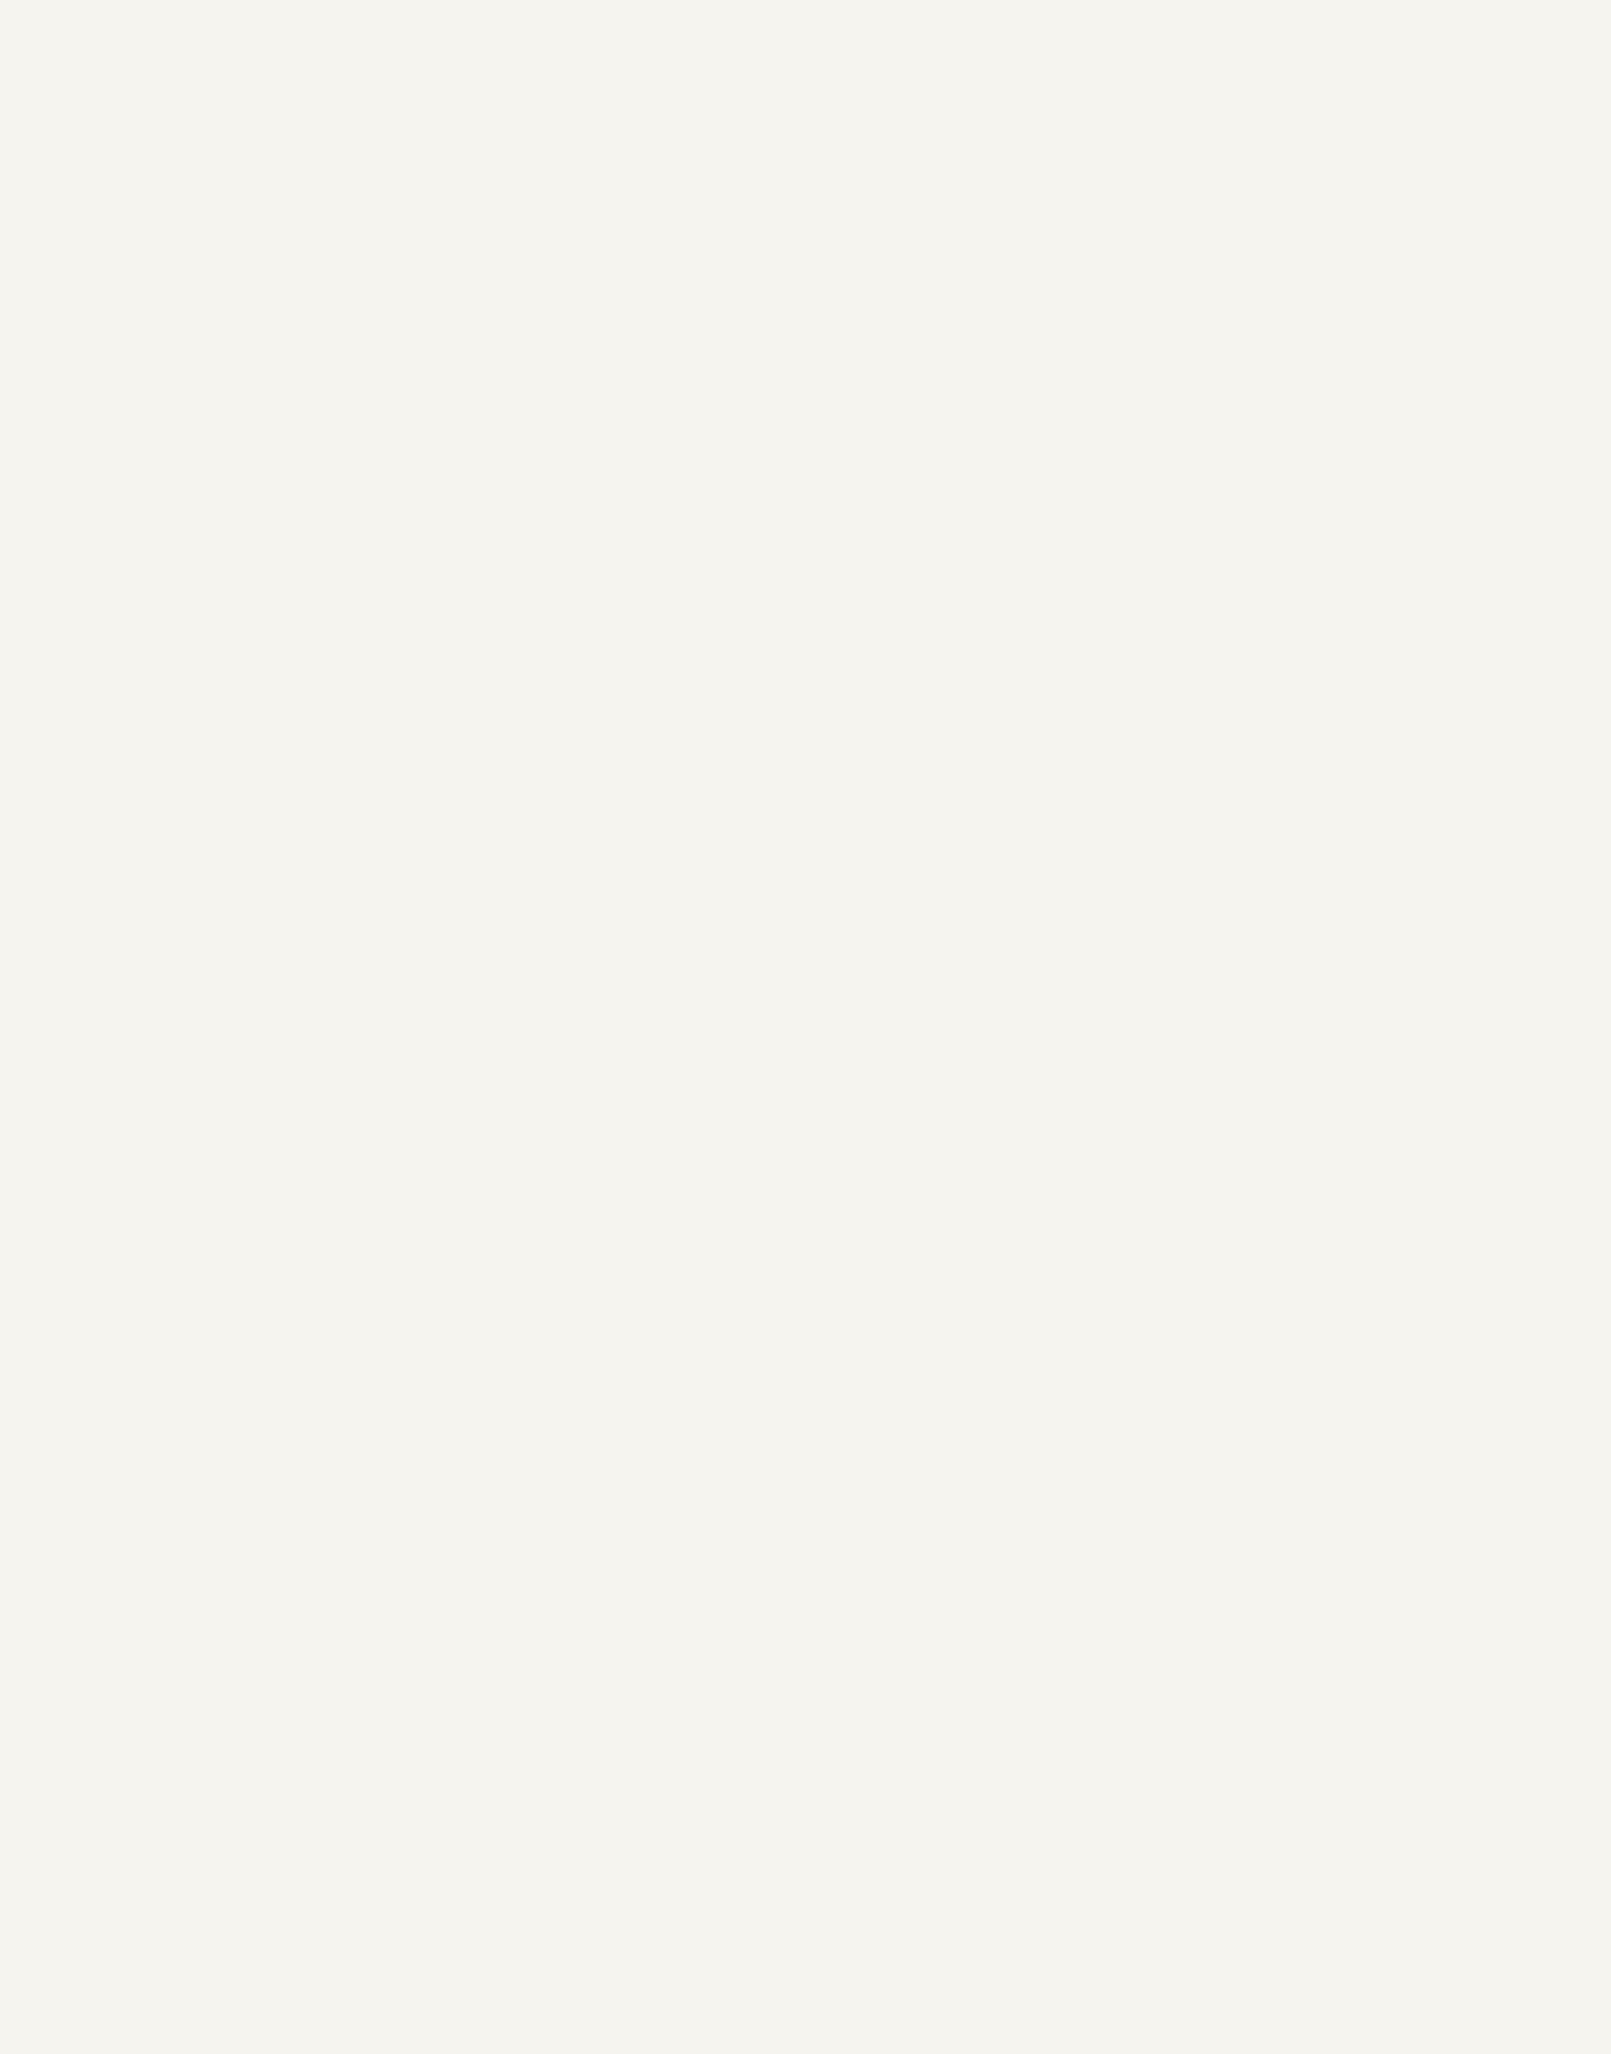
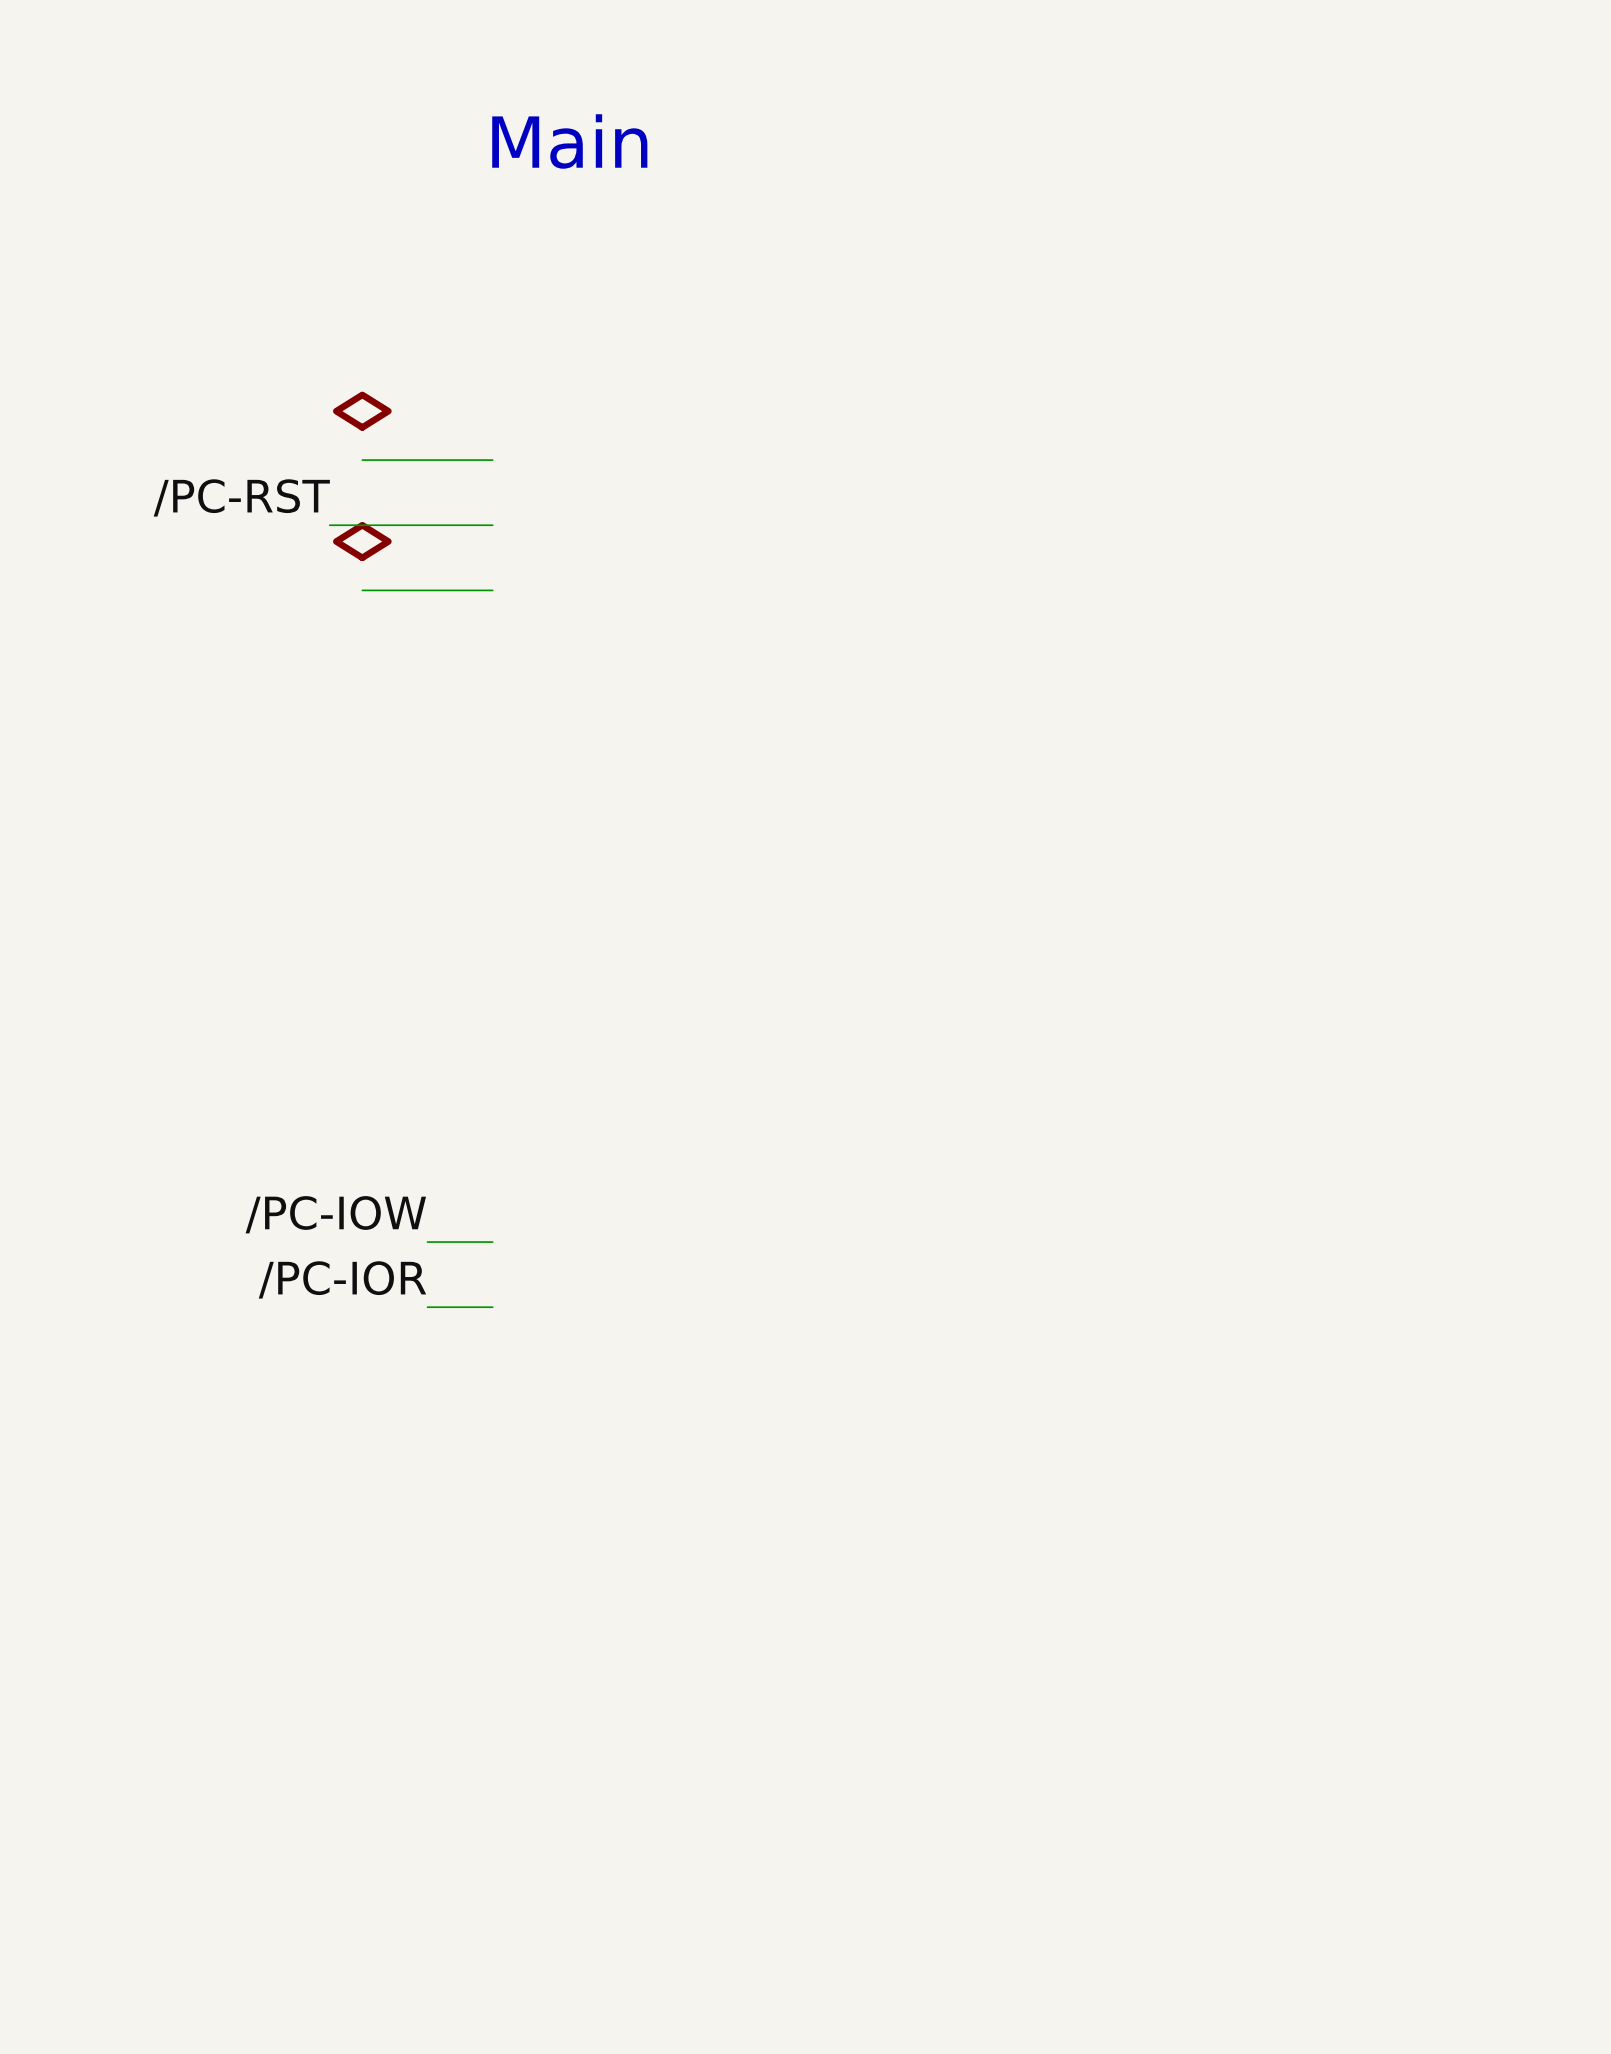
text: none -> Main (569, 141)
power symbol: none -> (362, 411)
wire: none -> (362, 460) (492, 460)
label: none -> /PC-RST (241, 497)
wire: none -> (329, 525) (492, 525)
power symbol: none -> (362, 541)
wire: none -> (362, 590) (492, 590)
label: none -> /PC-IOW (335, 1214)
wire: none -> (427, 1242) (492, 1242)
label: none -> /PC-IOR (342, 1279)
wire: none -> (427, 1307) (492, 1307)

